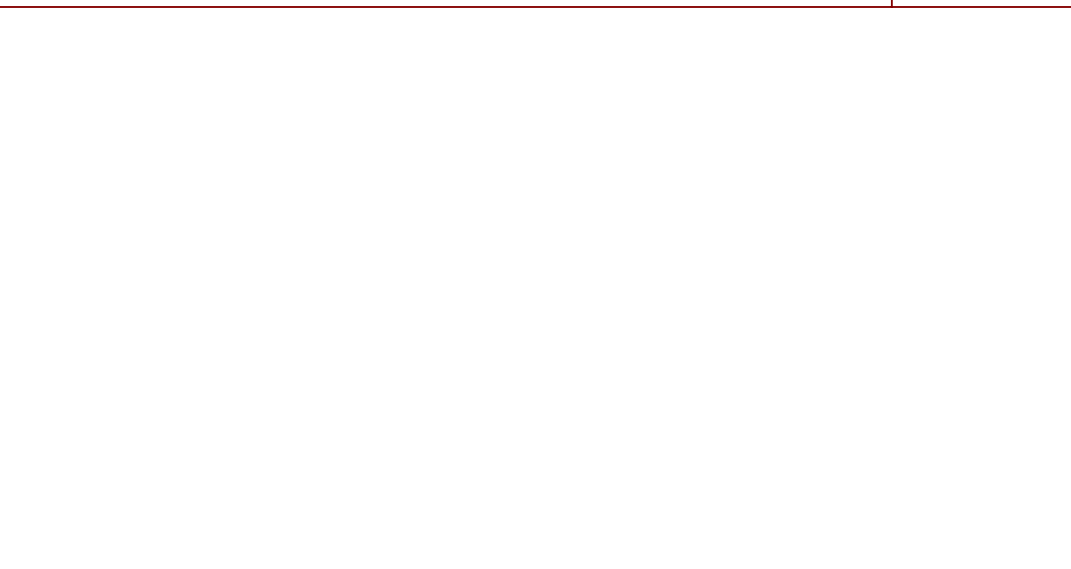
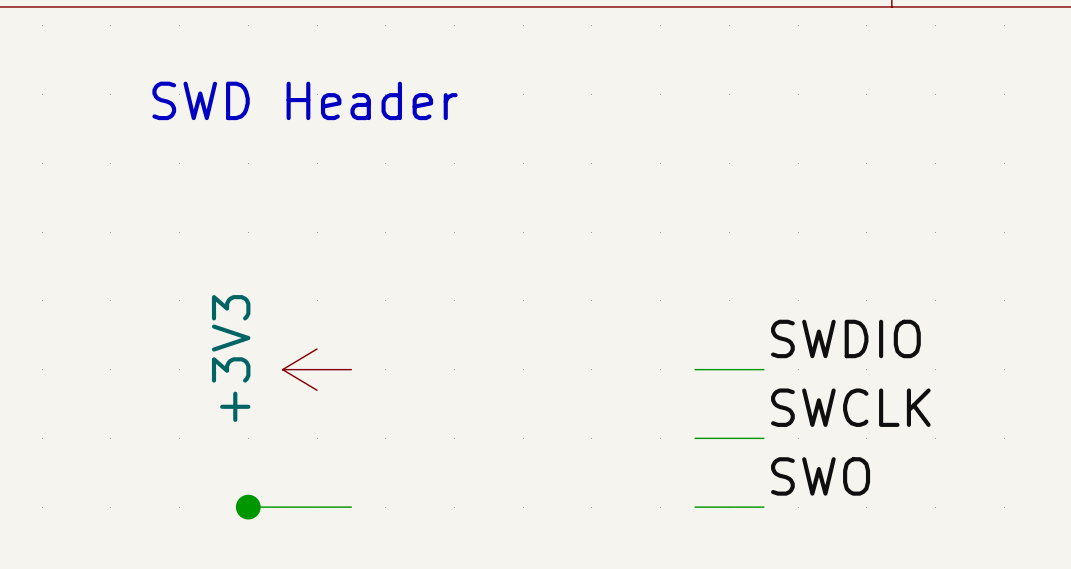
text: none -> SWD Header (305, 100)
label: none -> SWDIO (845, 338)
power symbol: none -> +3V3 (317, 369)
wire: none -> (695, 369) (763, 369)
label: none -> SWCLK (850, 407)
wire: none -> (695, 438) (763, 438)
label: none -> SWO (820, 476)
wire: none -> (248, 507) (351, 507)
junction: none -> (248, 507)
wire: none -> (695, 507) (763, 507)

